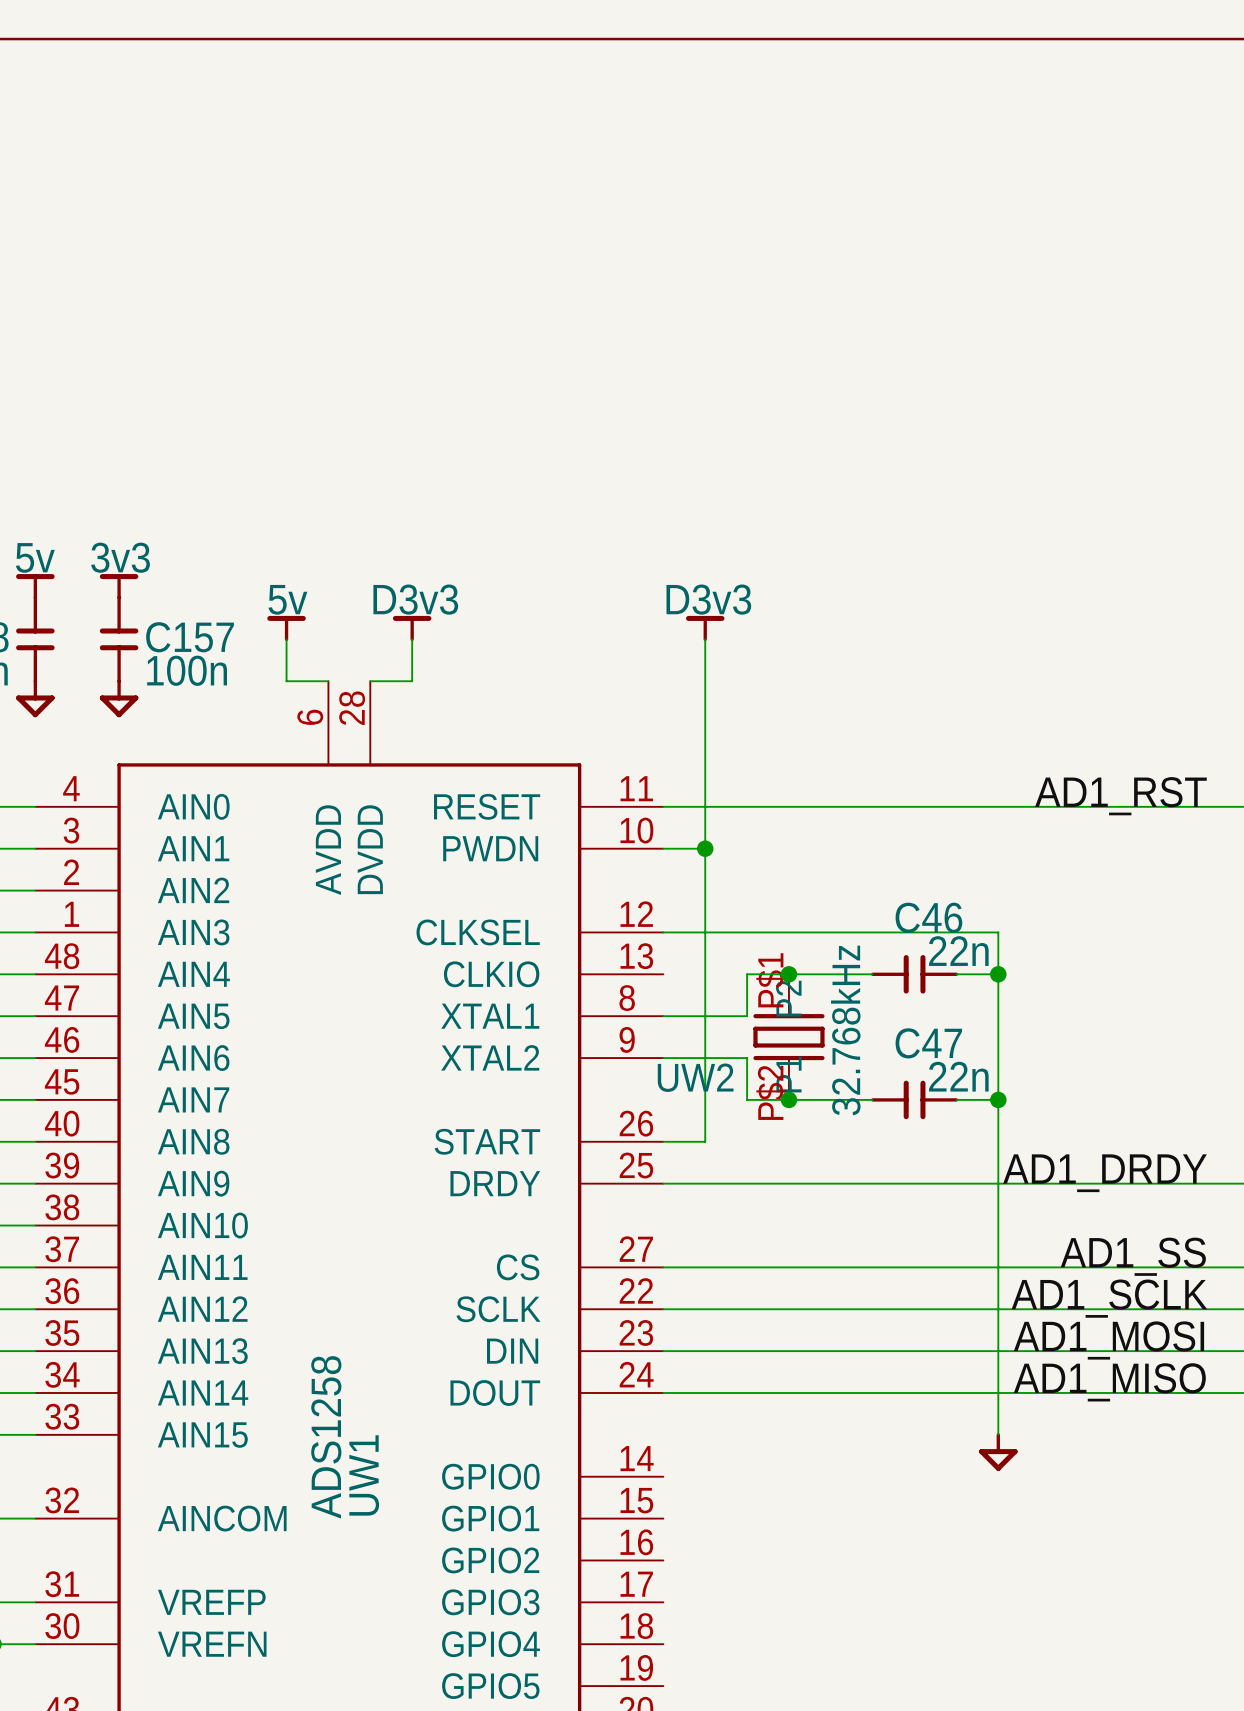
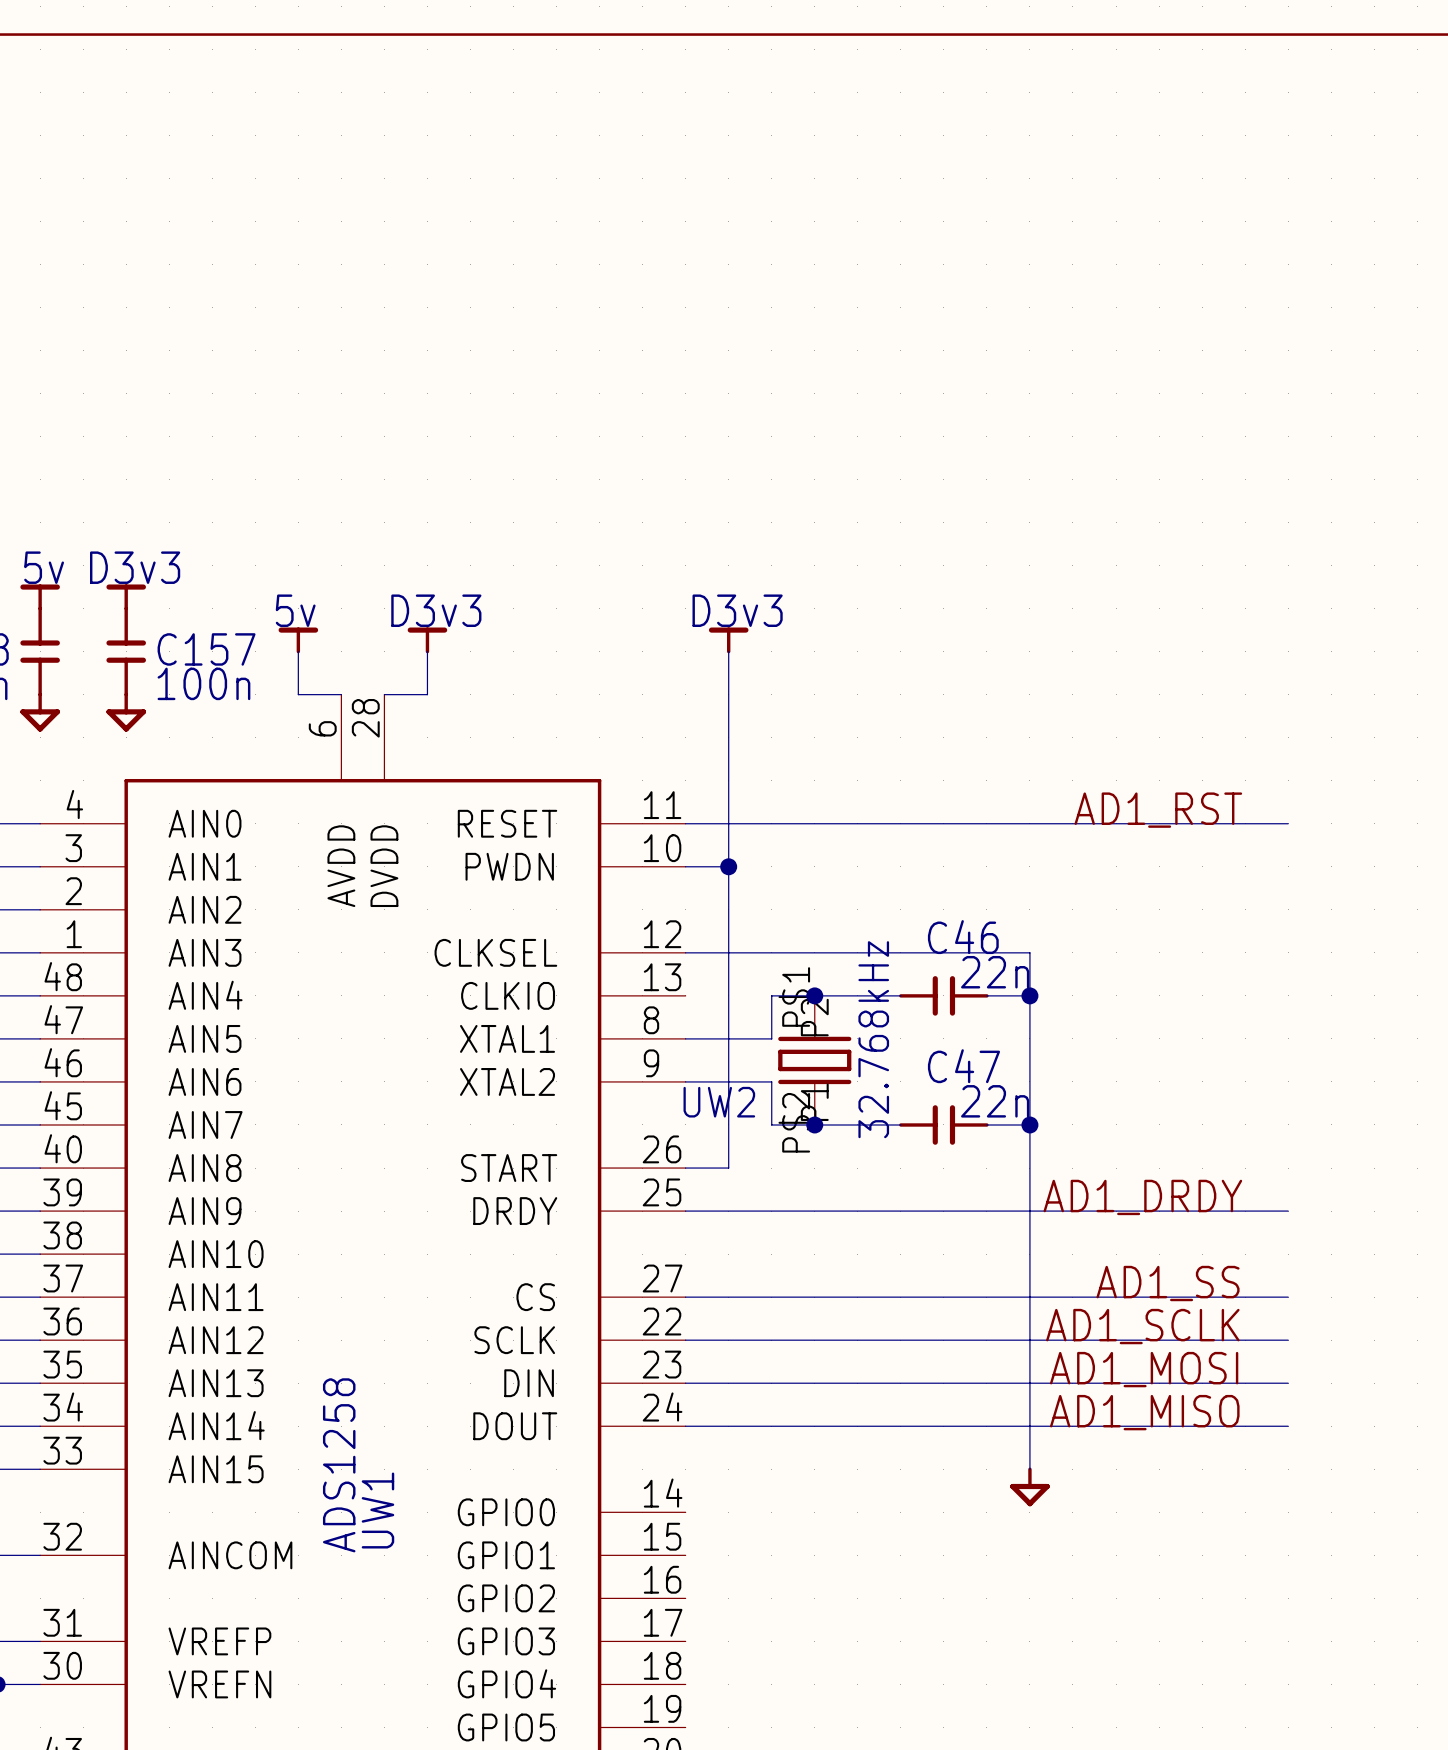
power symbol text: 3v3 (120, 557) -> none
power symbol text: none -> D3v3 (135, 567)

